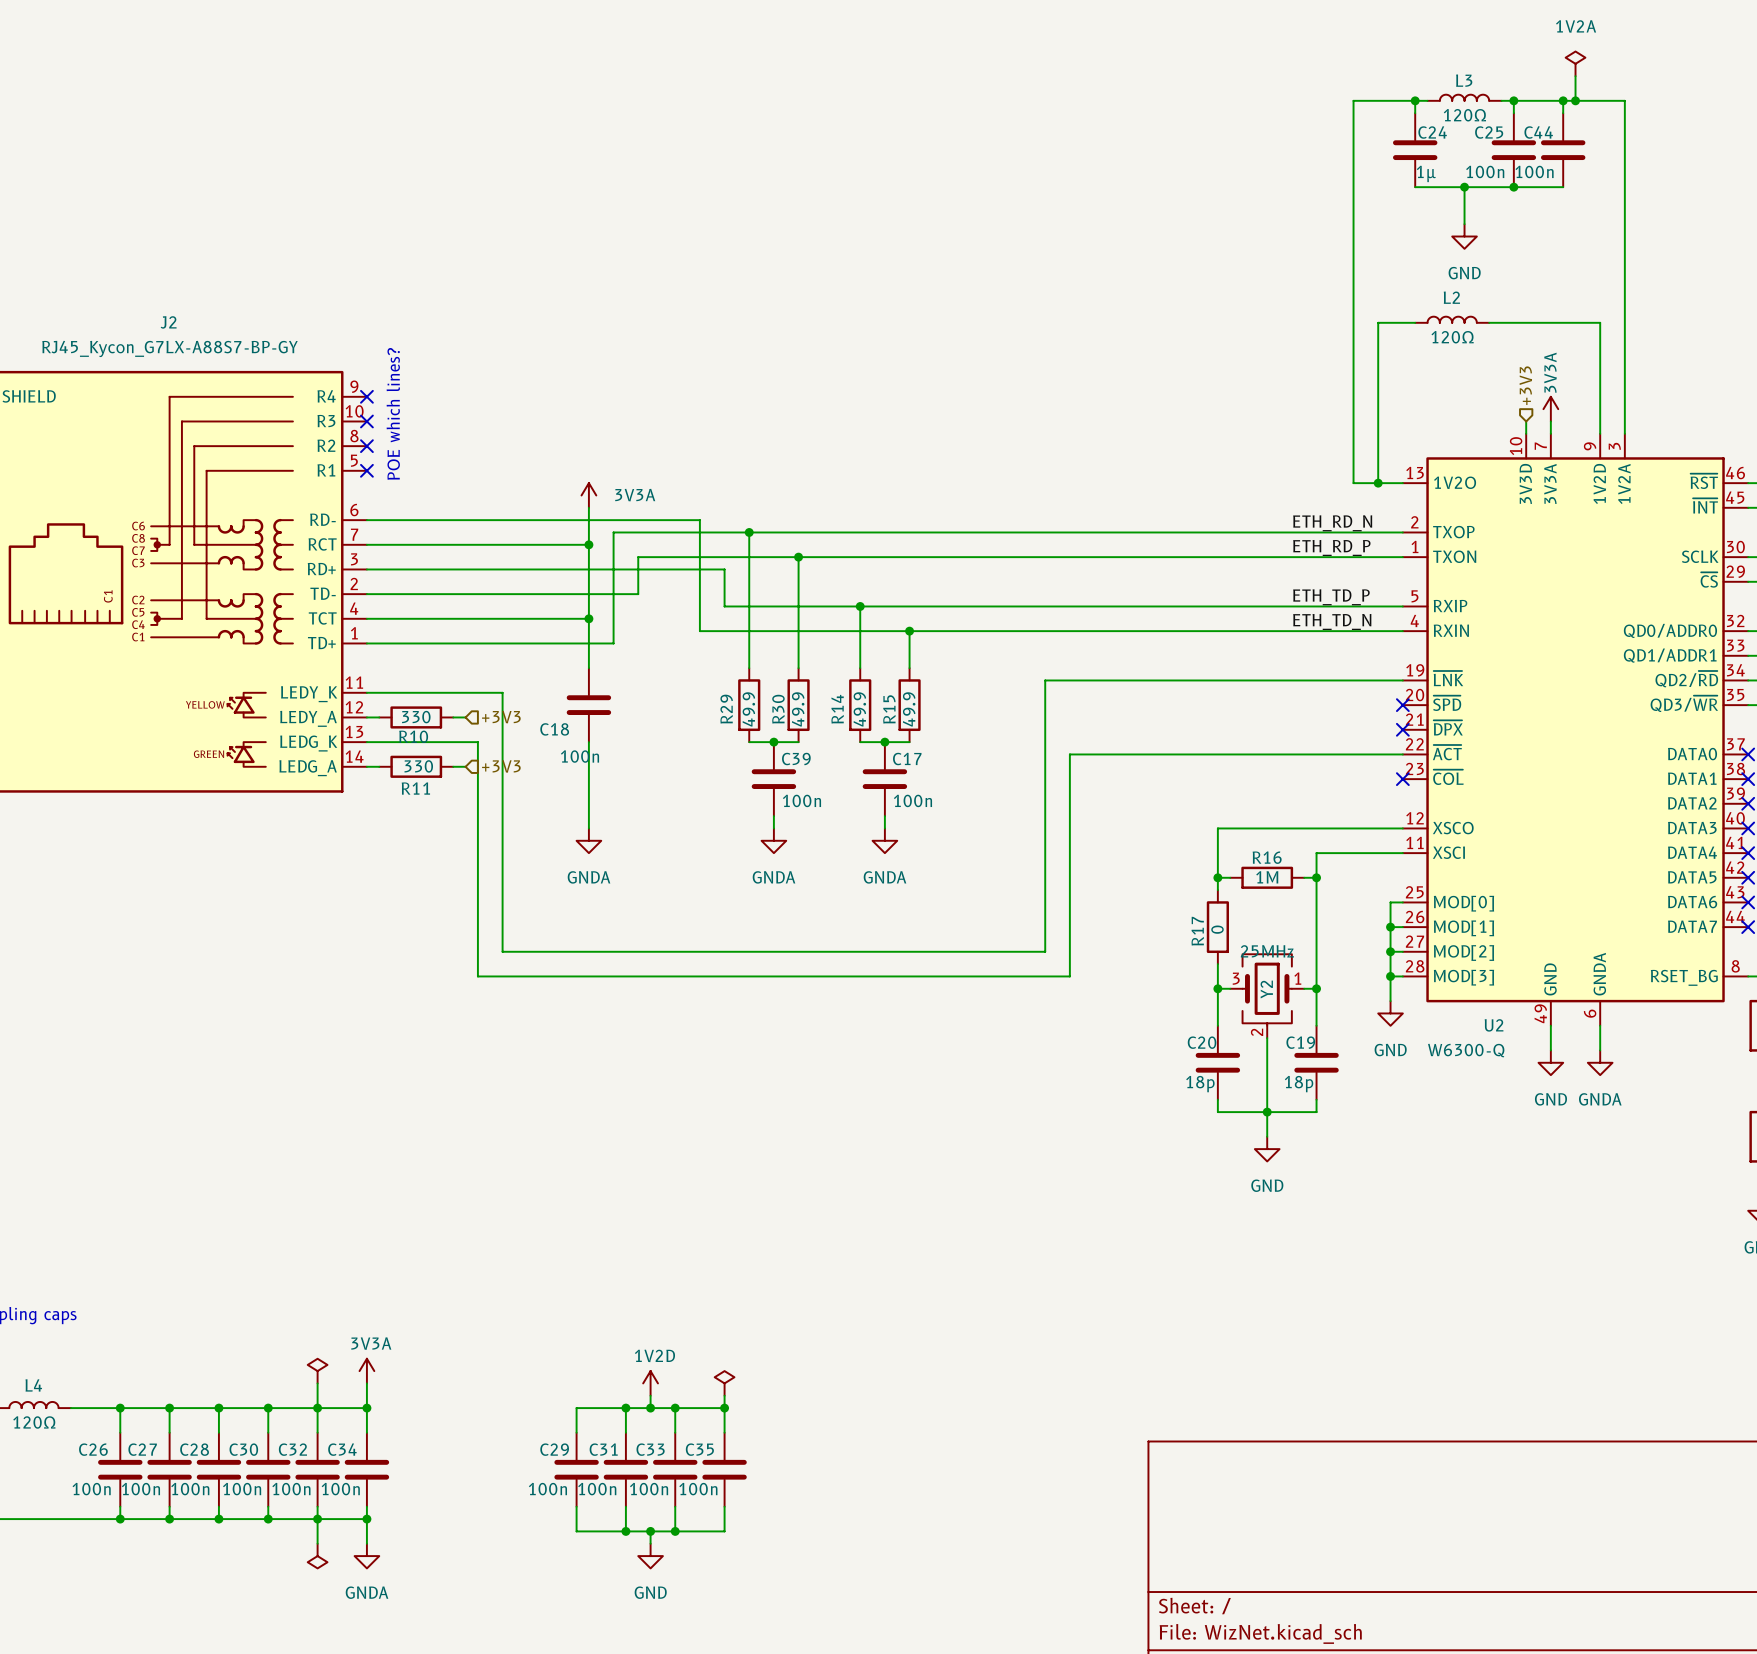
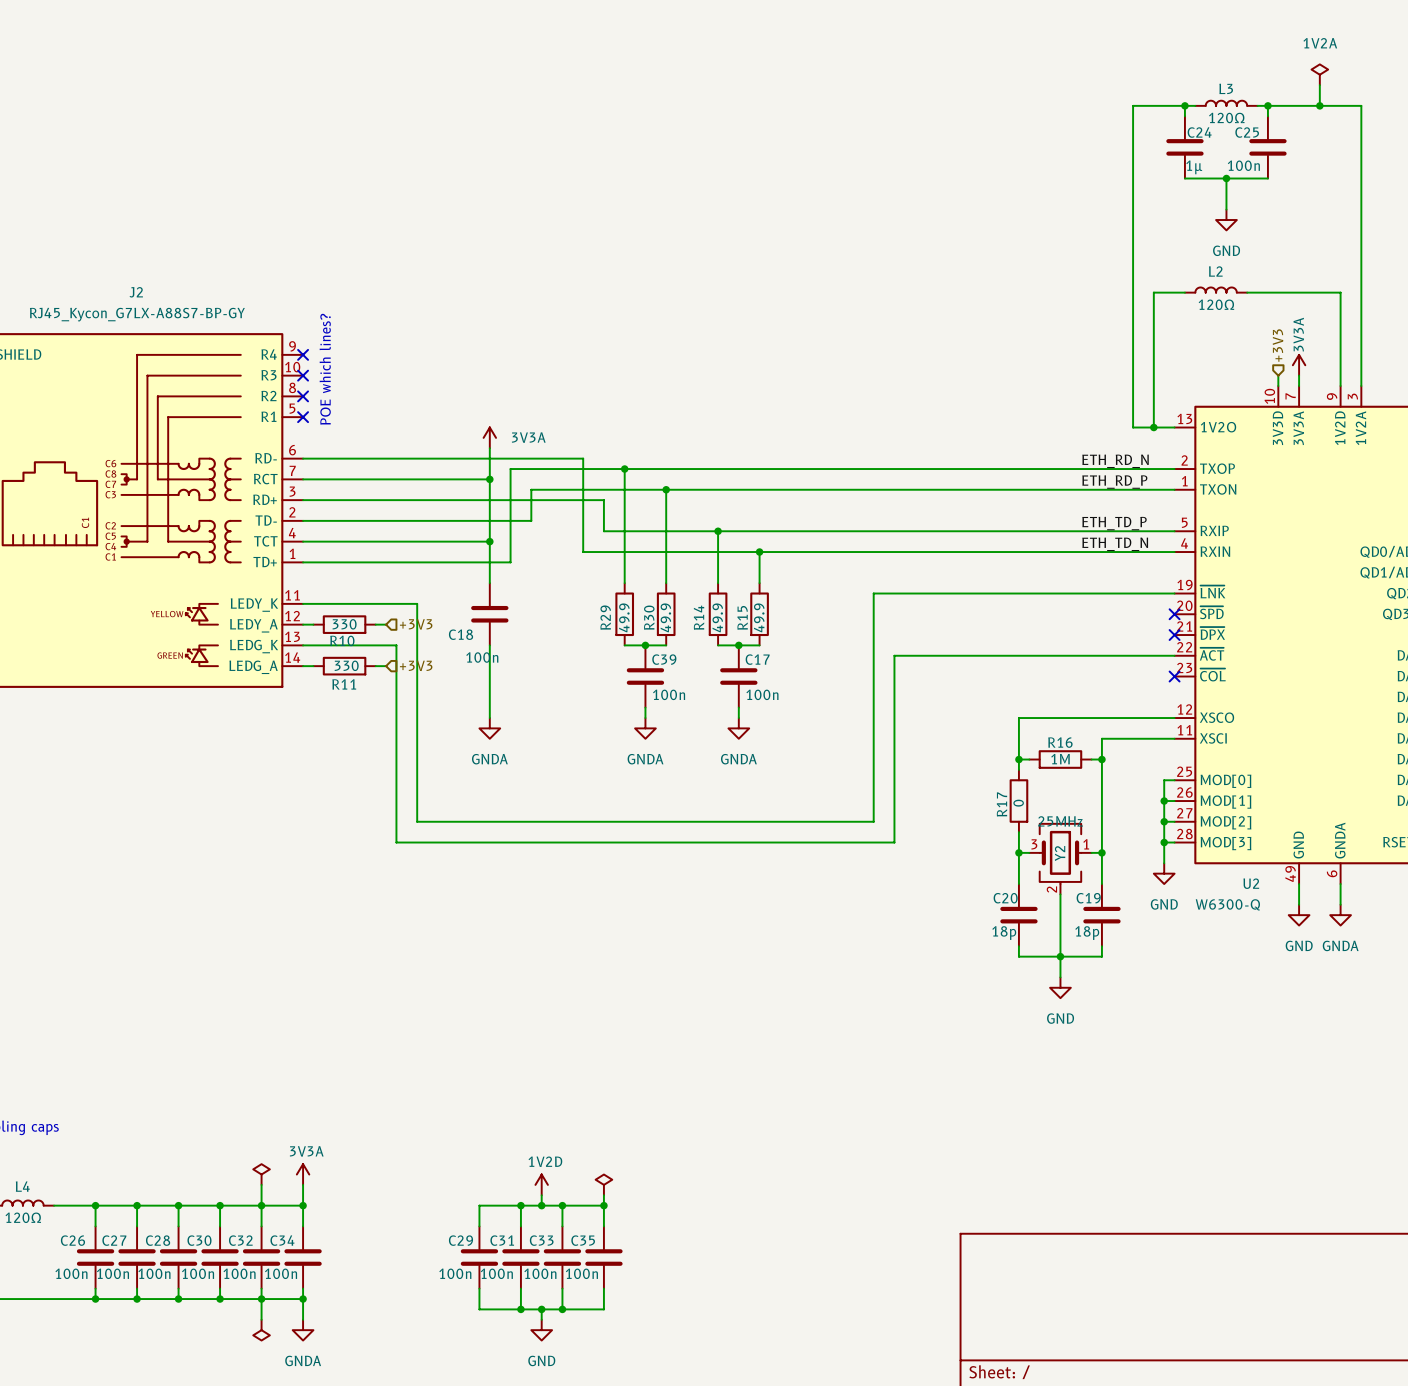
wire: (1563, 100) (1563, 113) -> none
junction: (1563, 100) -> none
C44: 100n (1563, 150) -> none
wire: (1513, 187) (1563, 187) -> none
junction: (1513, 187) -> none

